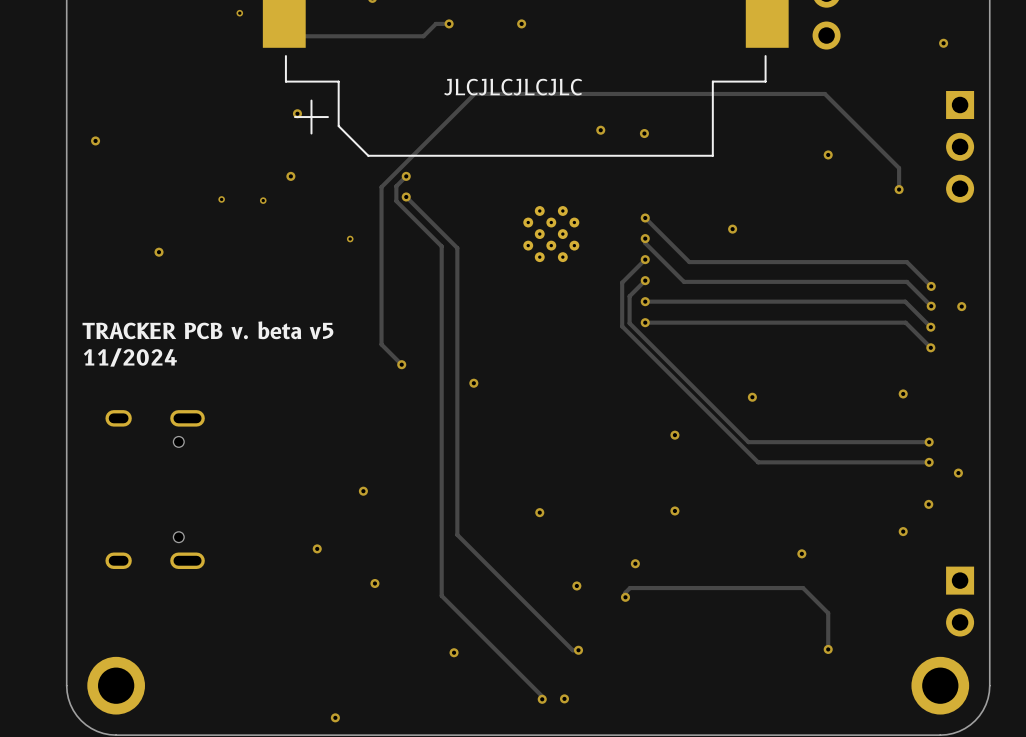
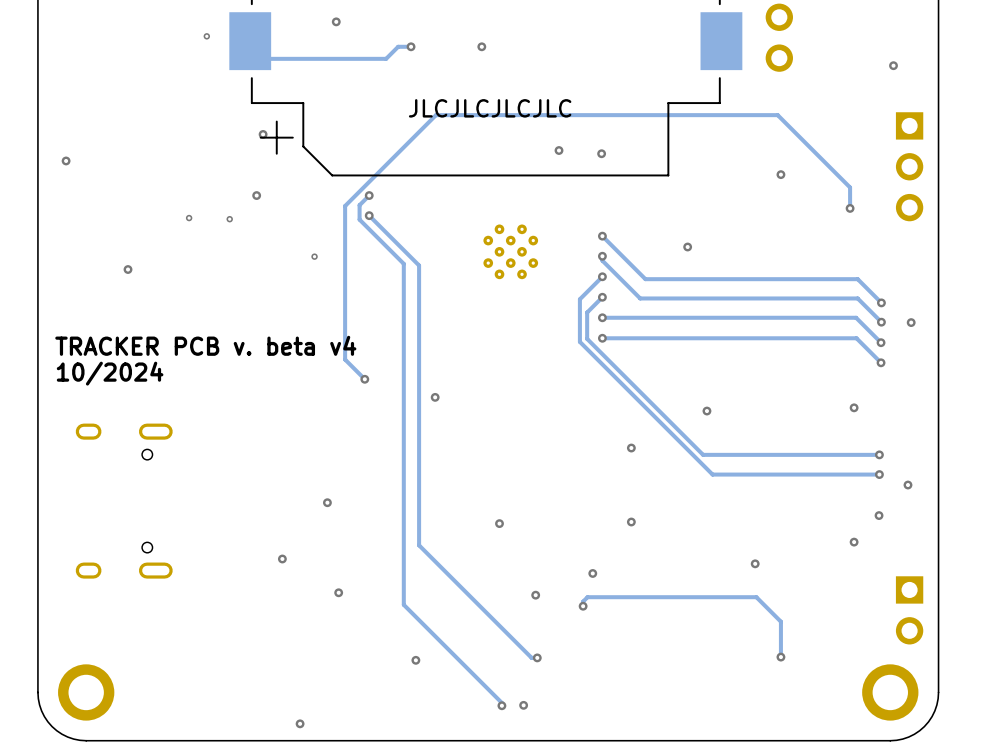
text: TRACKER PCB v. beta v5 (207, 330) -> TRACKER PCB v. beta v4 (205, 345)
text: 11/2024 (130, 357) -> 10/2024 (110, 373)

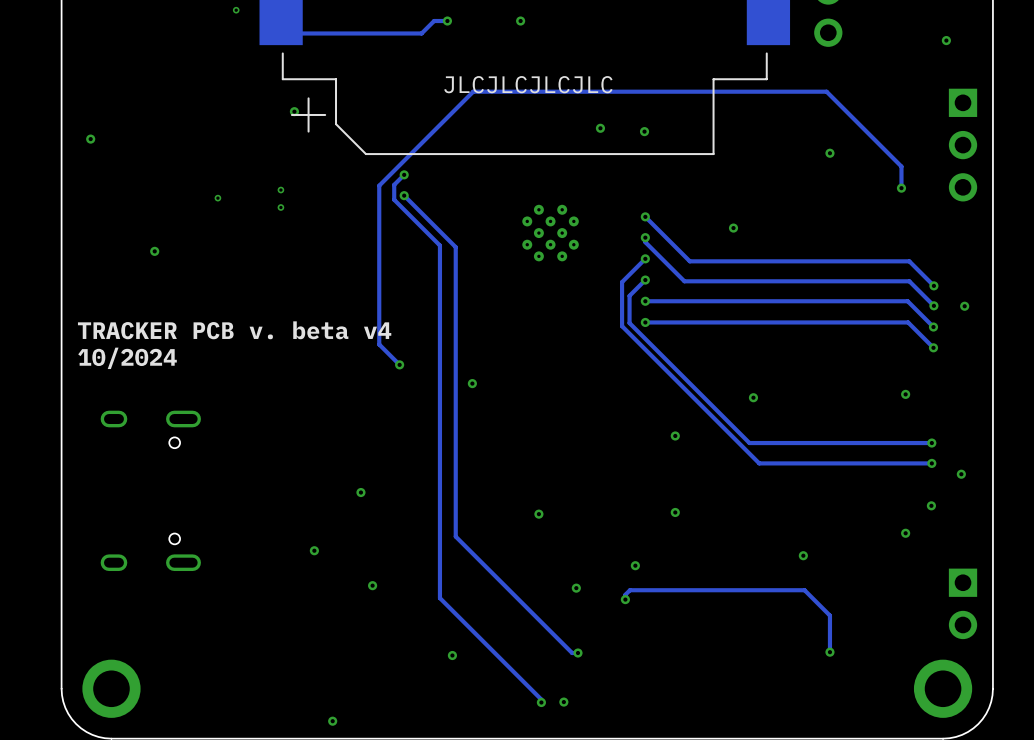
via: (256, 195) -> none
via: none -> (280, 190)
via: (229, 219) -> none
via: none -> (280, 207)
via: (314, 256) -> none

